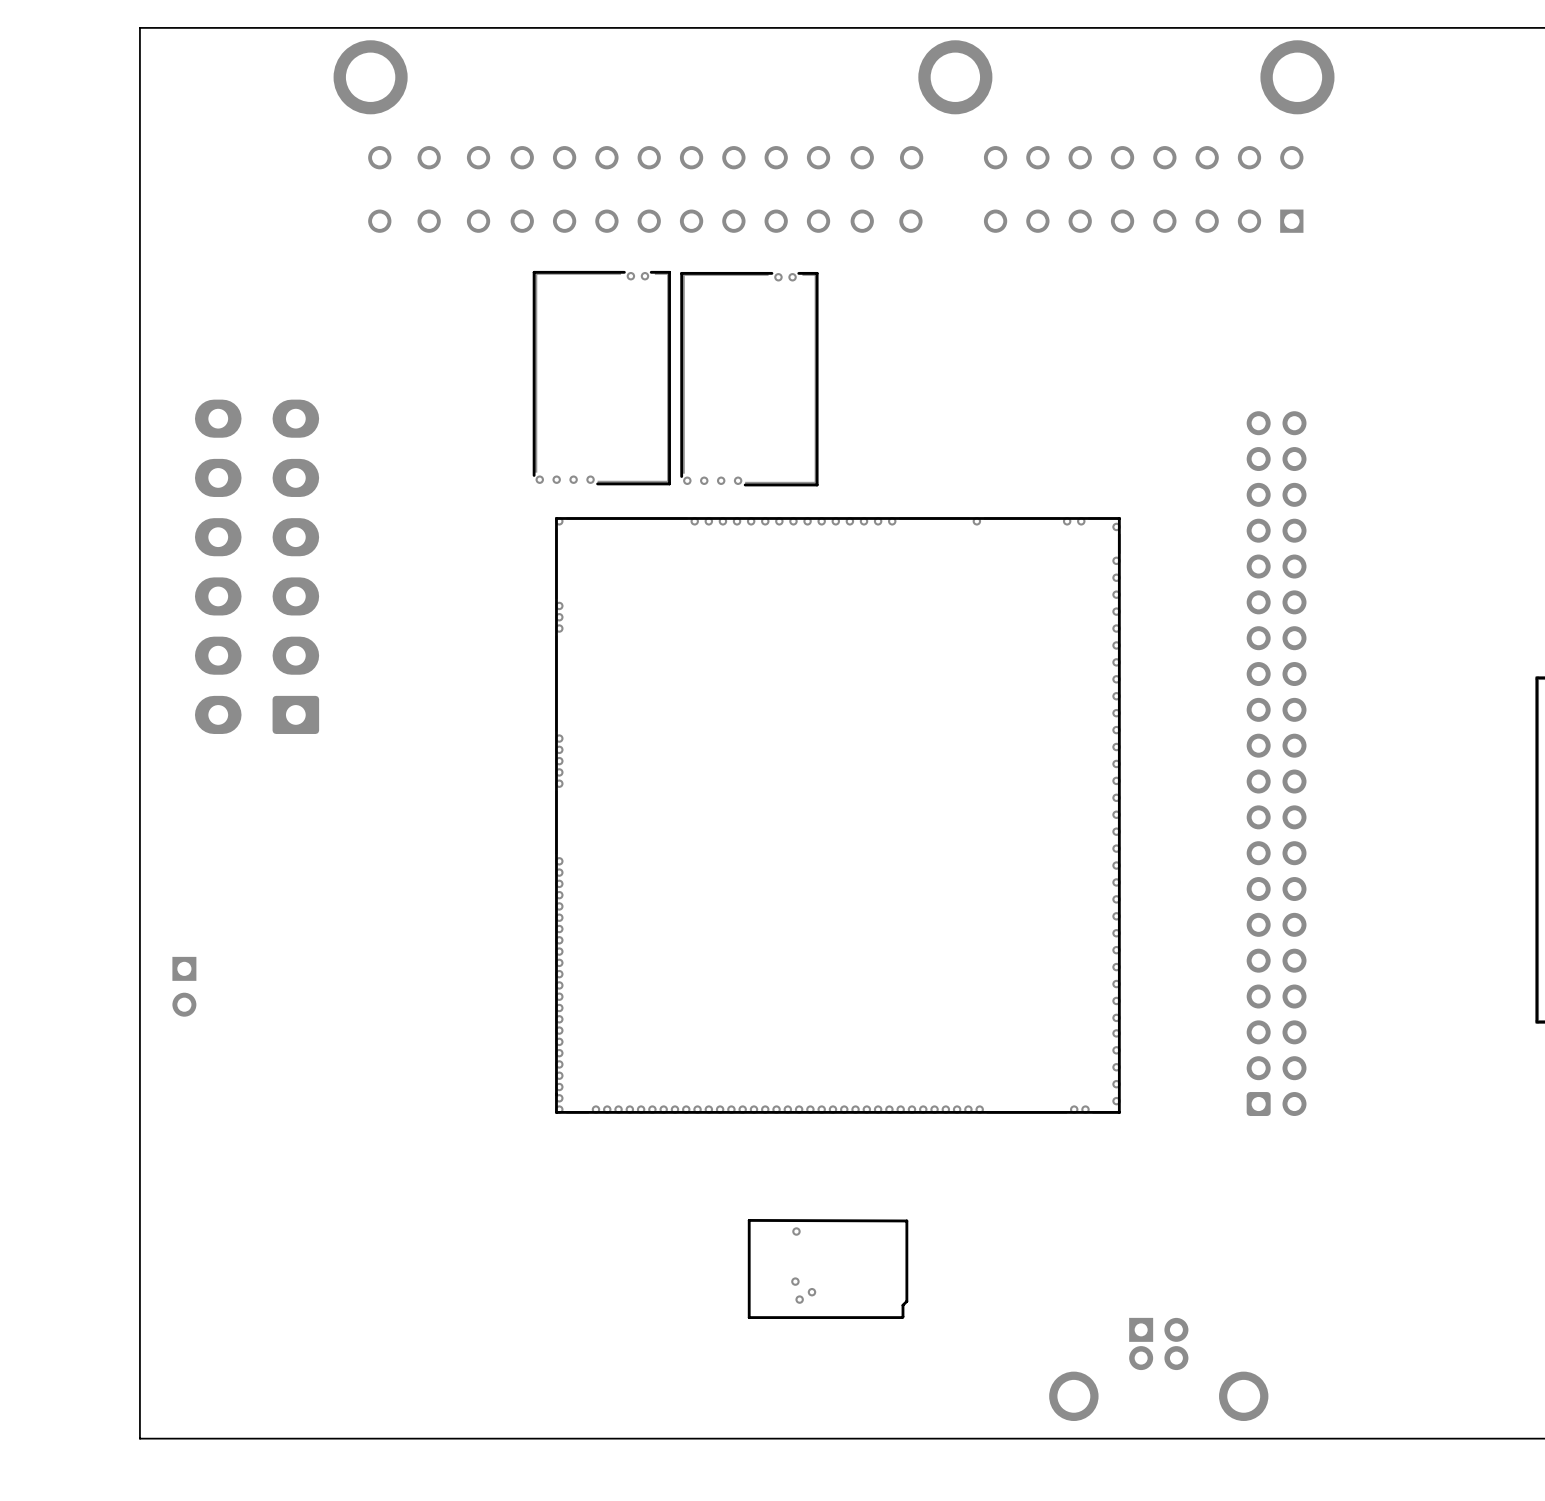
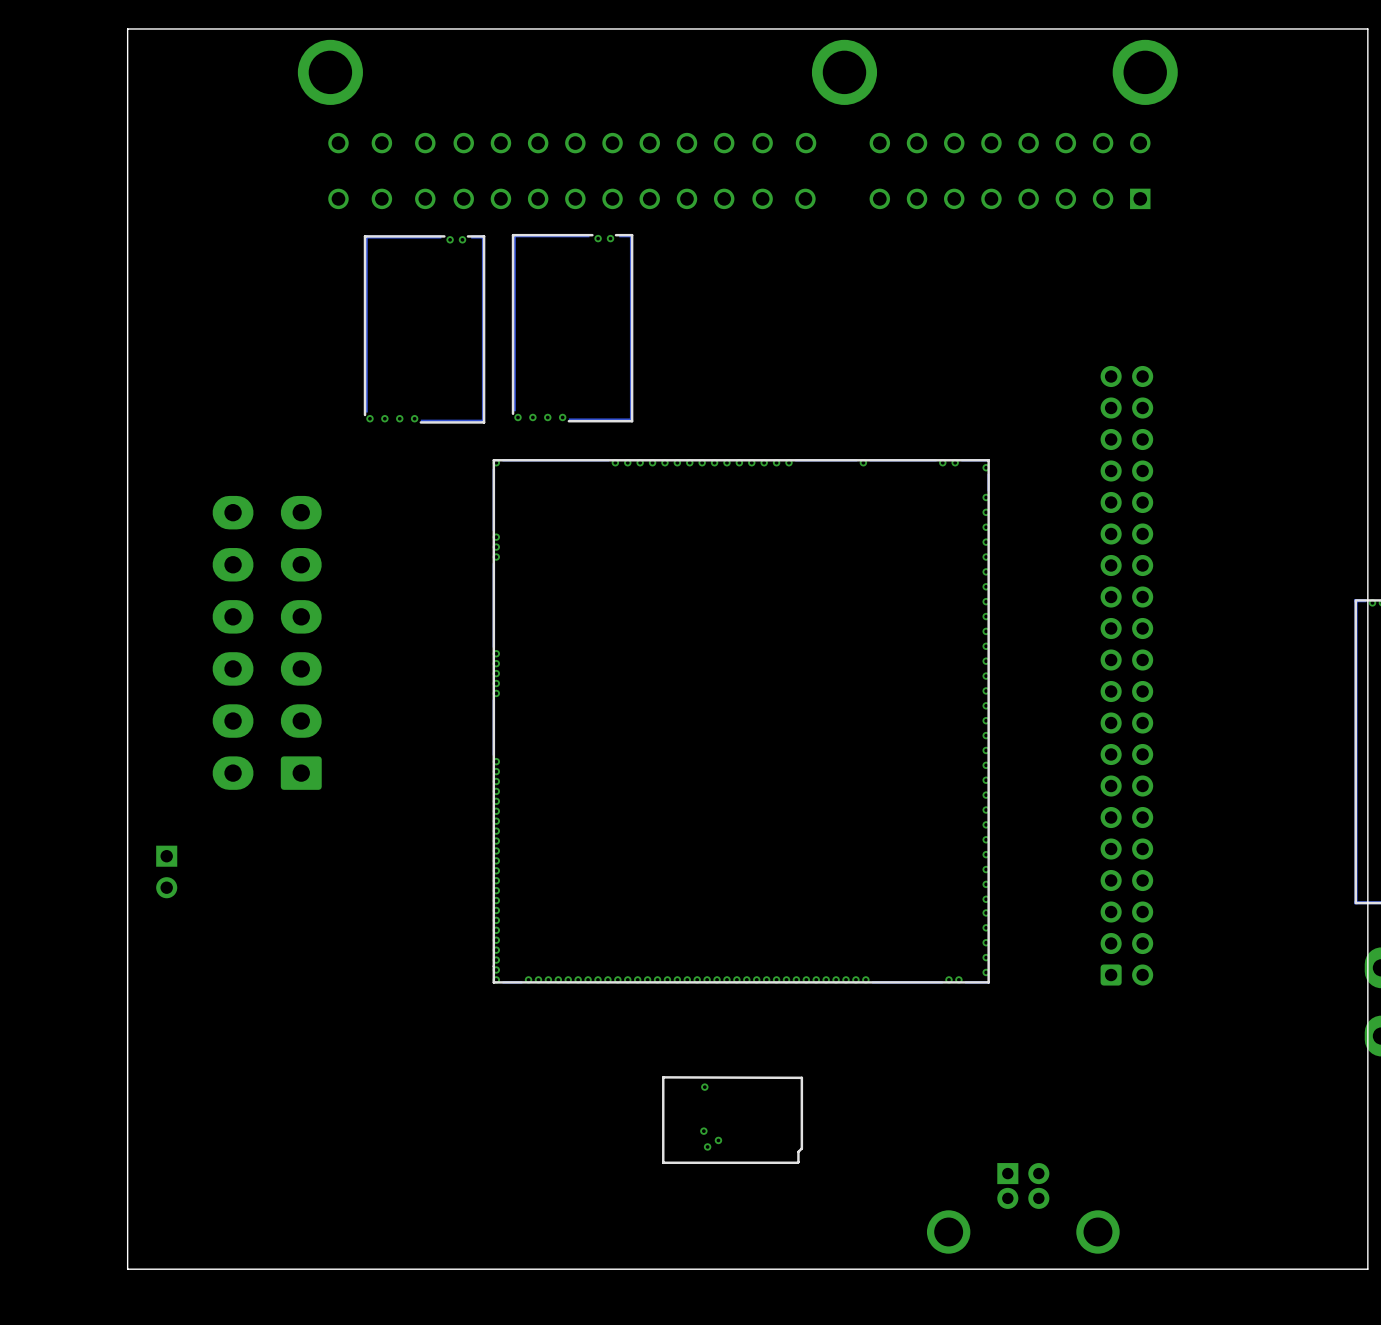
part: none -> (424, 329)
part position: (601, 378) -> (572, 328)
part: (749, 379) -> none
part position: (257, 566) -> (267, 642)

